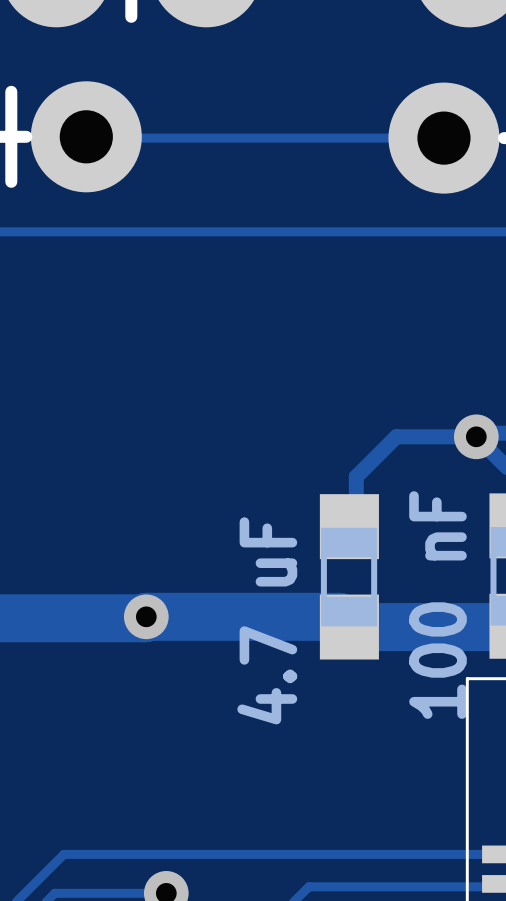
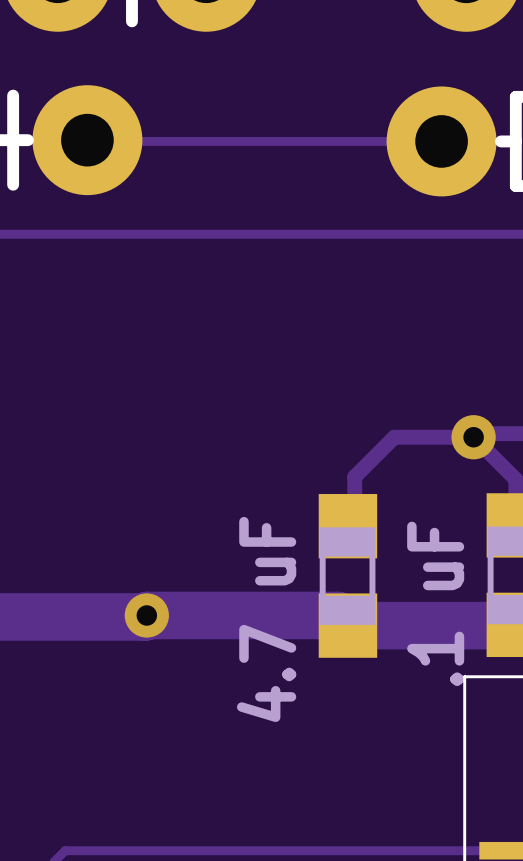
part value: 100 nF (438, 605) -> .1 uF (435, 603)

